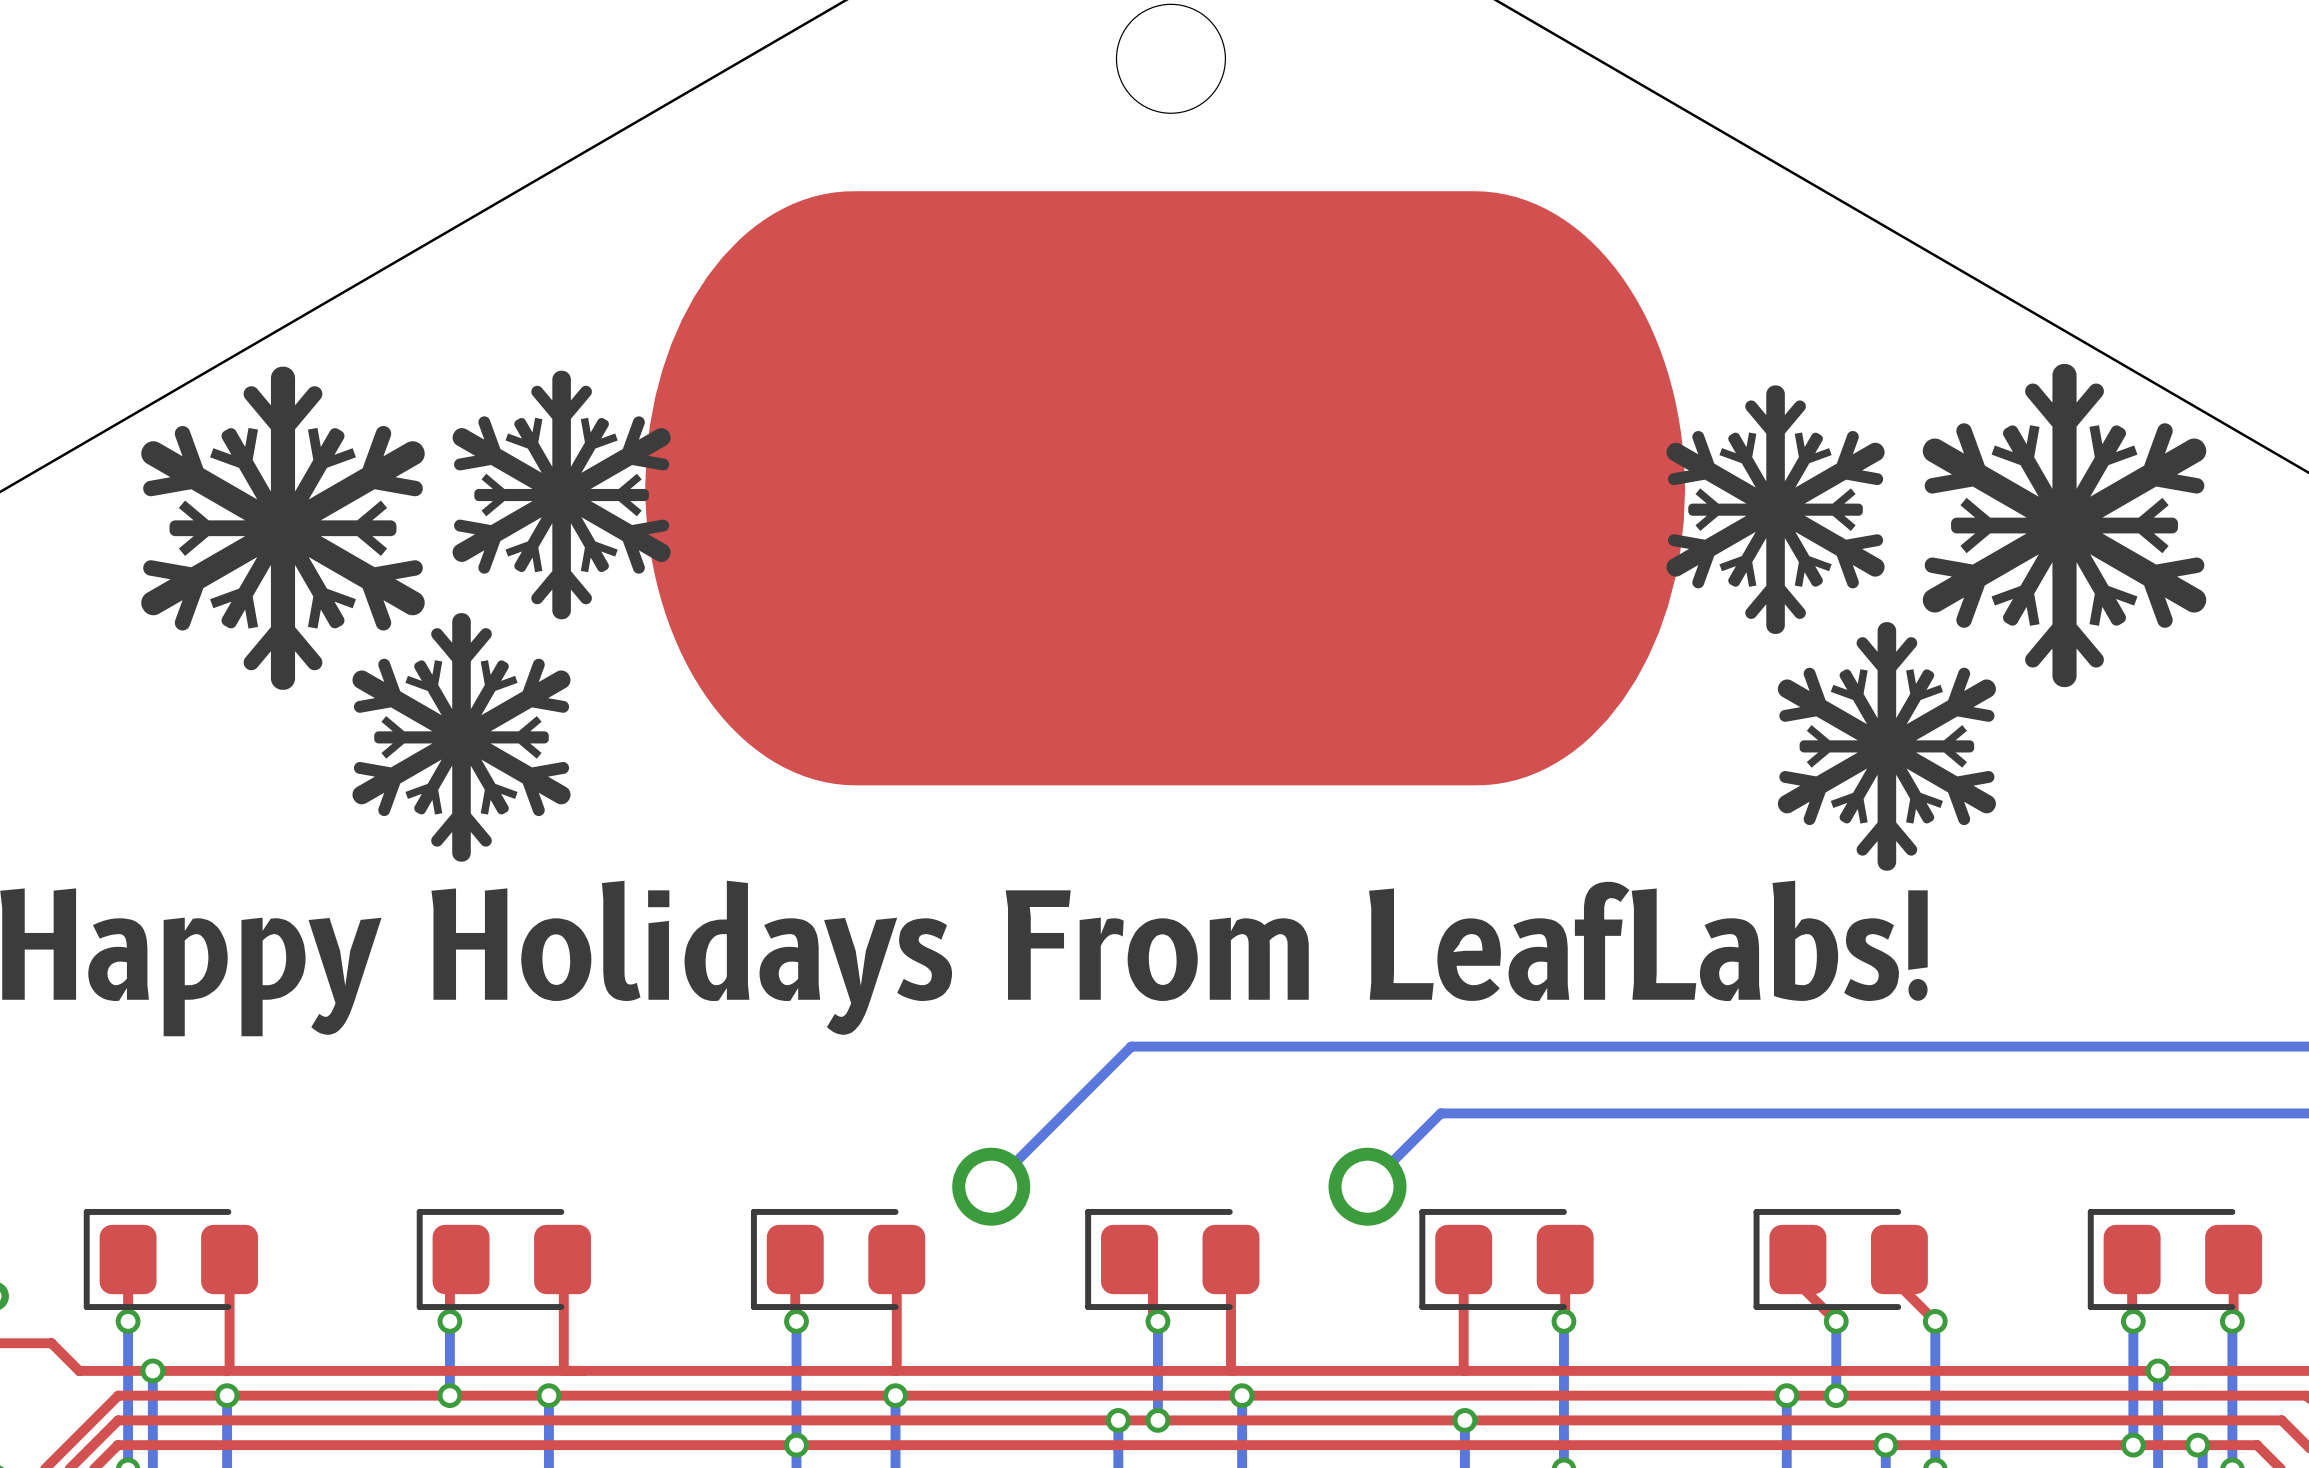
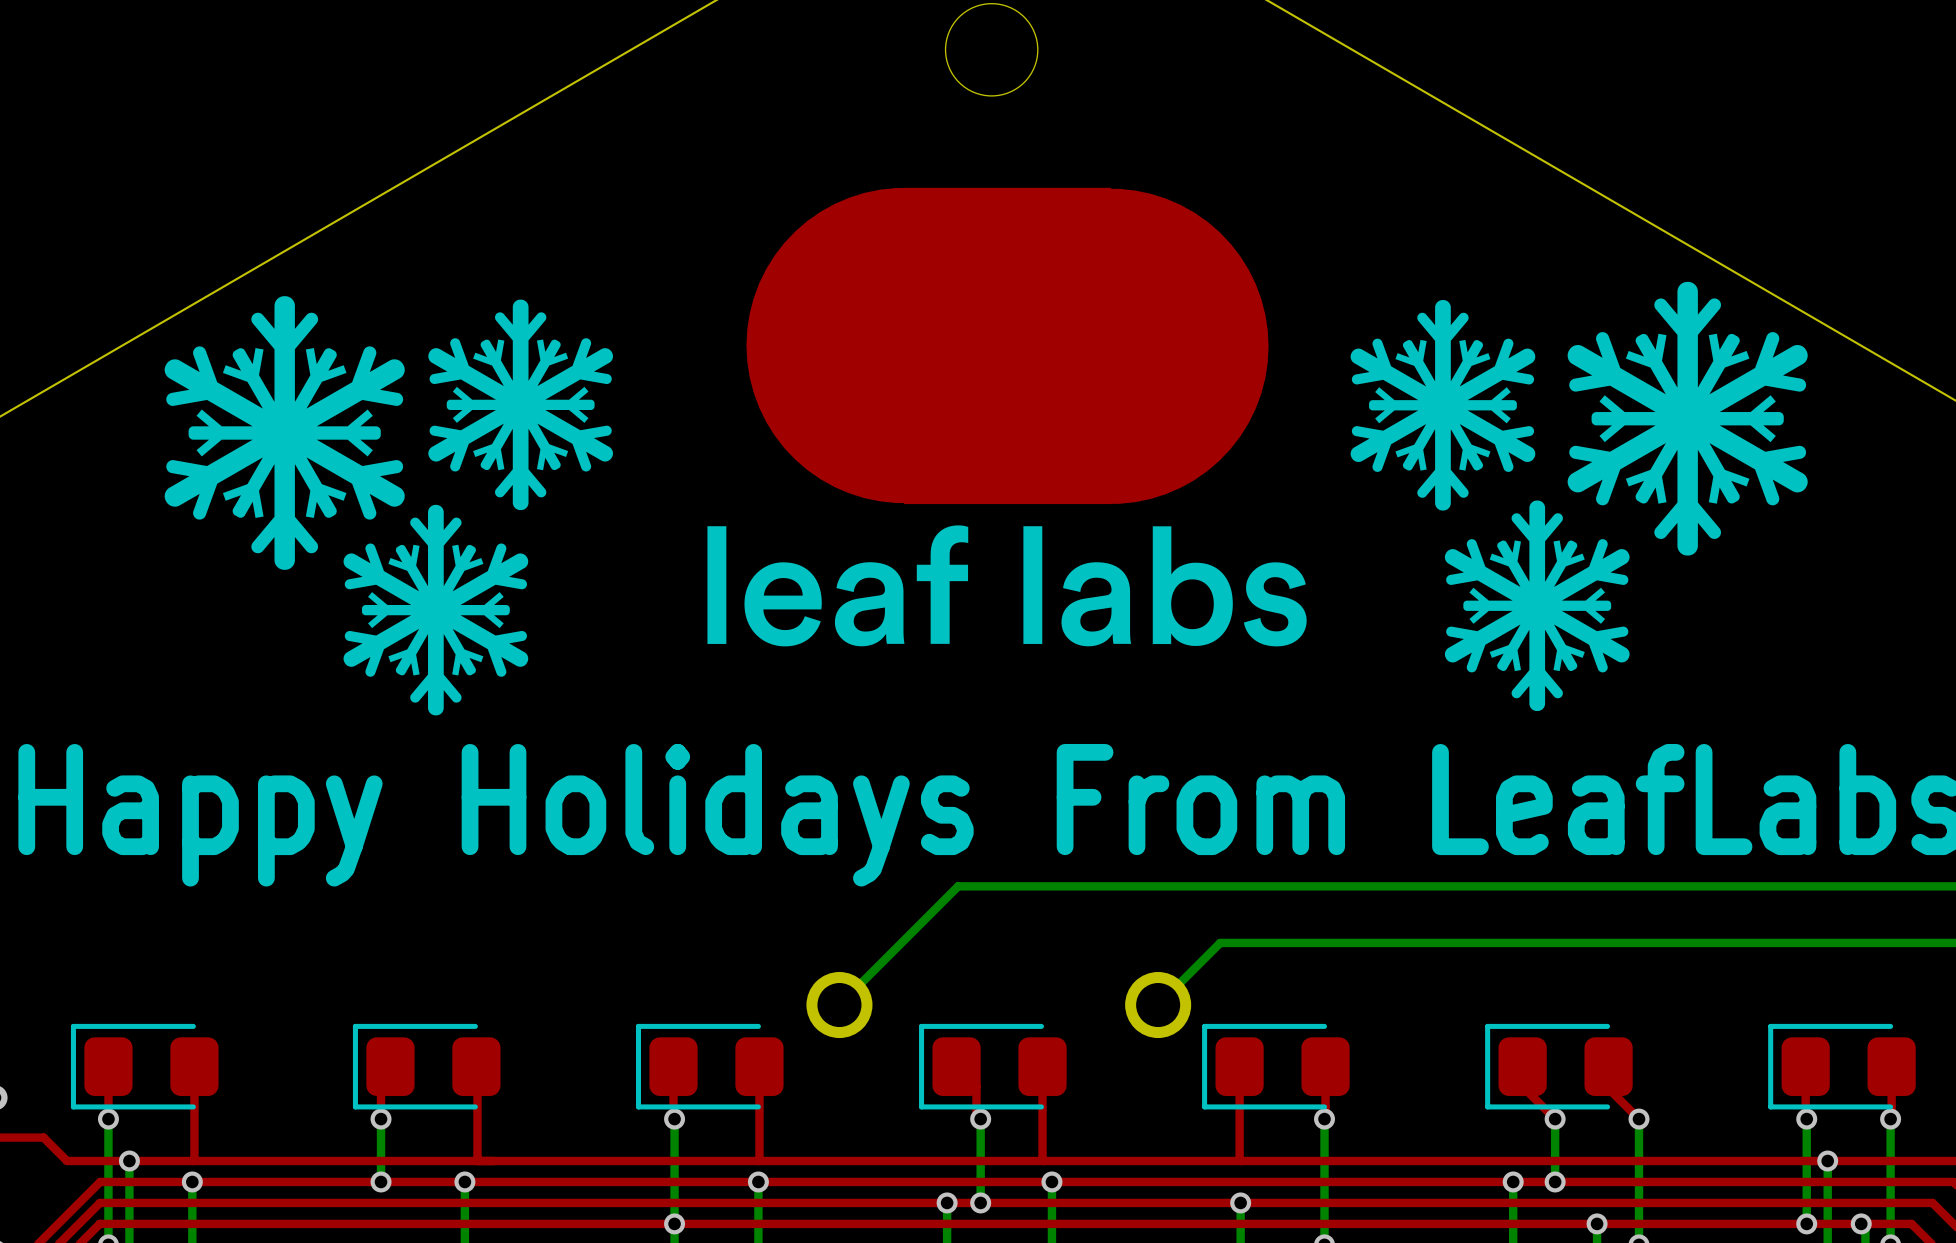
drawing: [645, 191, 1686, 786] -> none
drawing: none -> [707, 187, 1307, 647]
drawing position: (561, 495) -> (520, 404)
drawing position: (1775, 509) -> (1442, 405)
drawing position: (2064, 525) -> (1687, 418)
drawing position: (282, 528) -> (284, 432)
drawing position: (461, 737) -> (435, 610)
drawing position: (1886, 746) -> (1537, 605)

